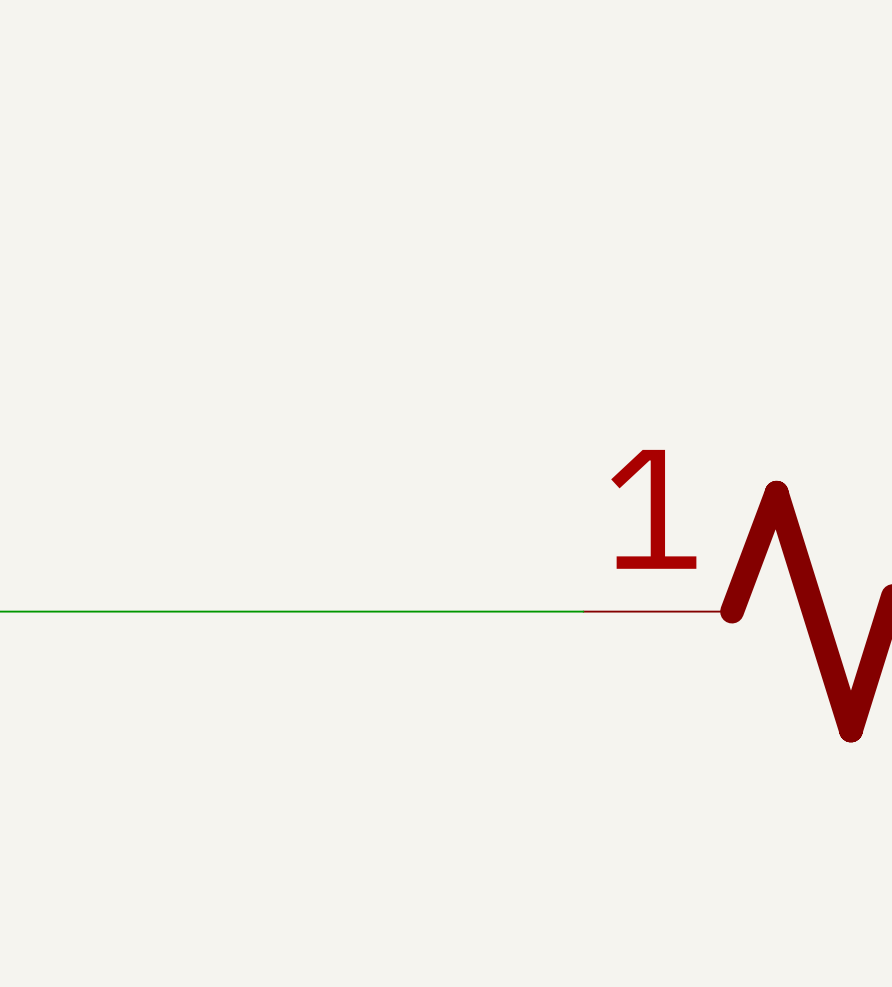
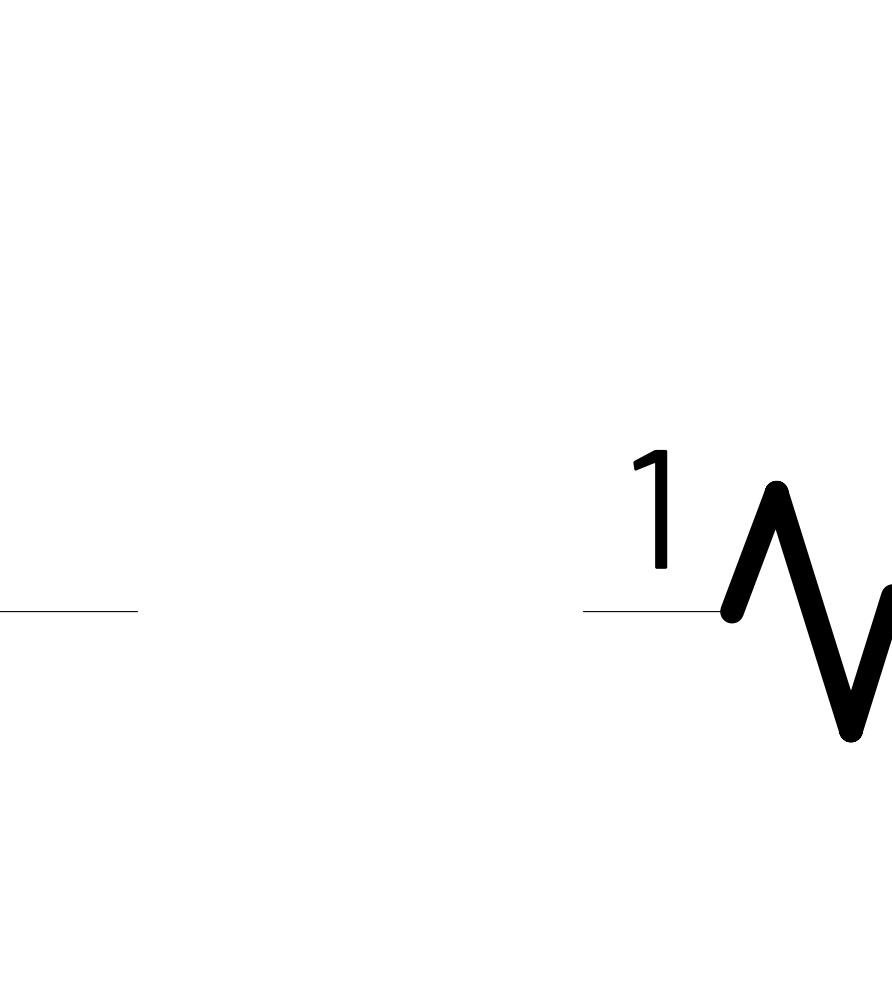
wire: (137, 611) (583, 611) -> none

